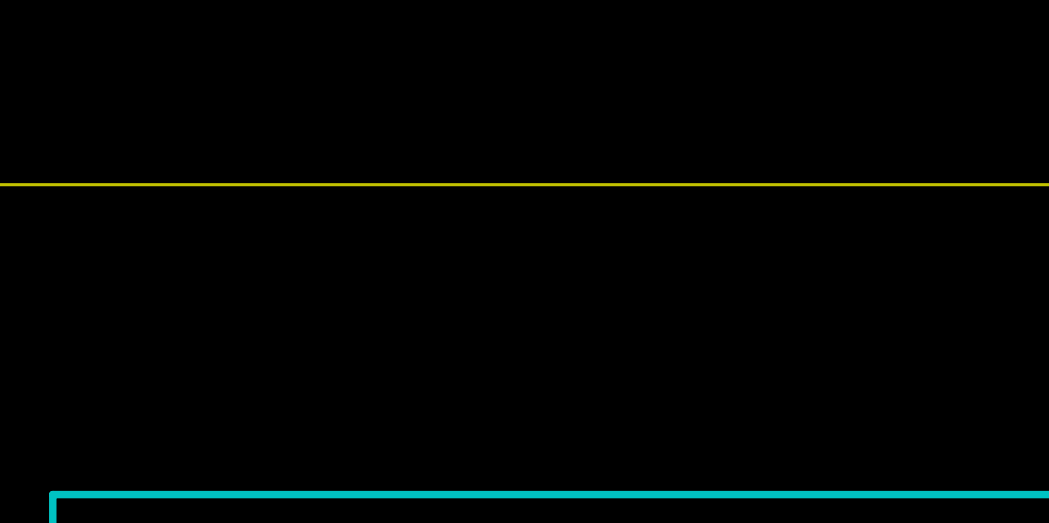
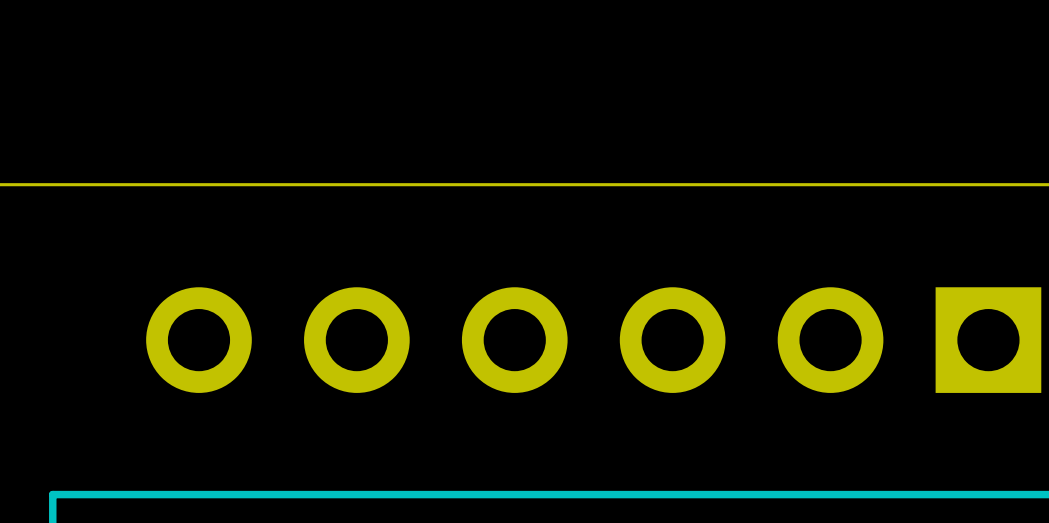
part: none -> (593, 340)

